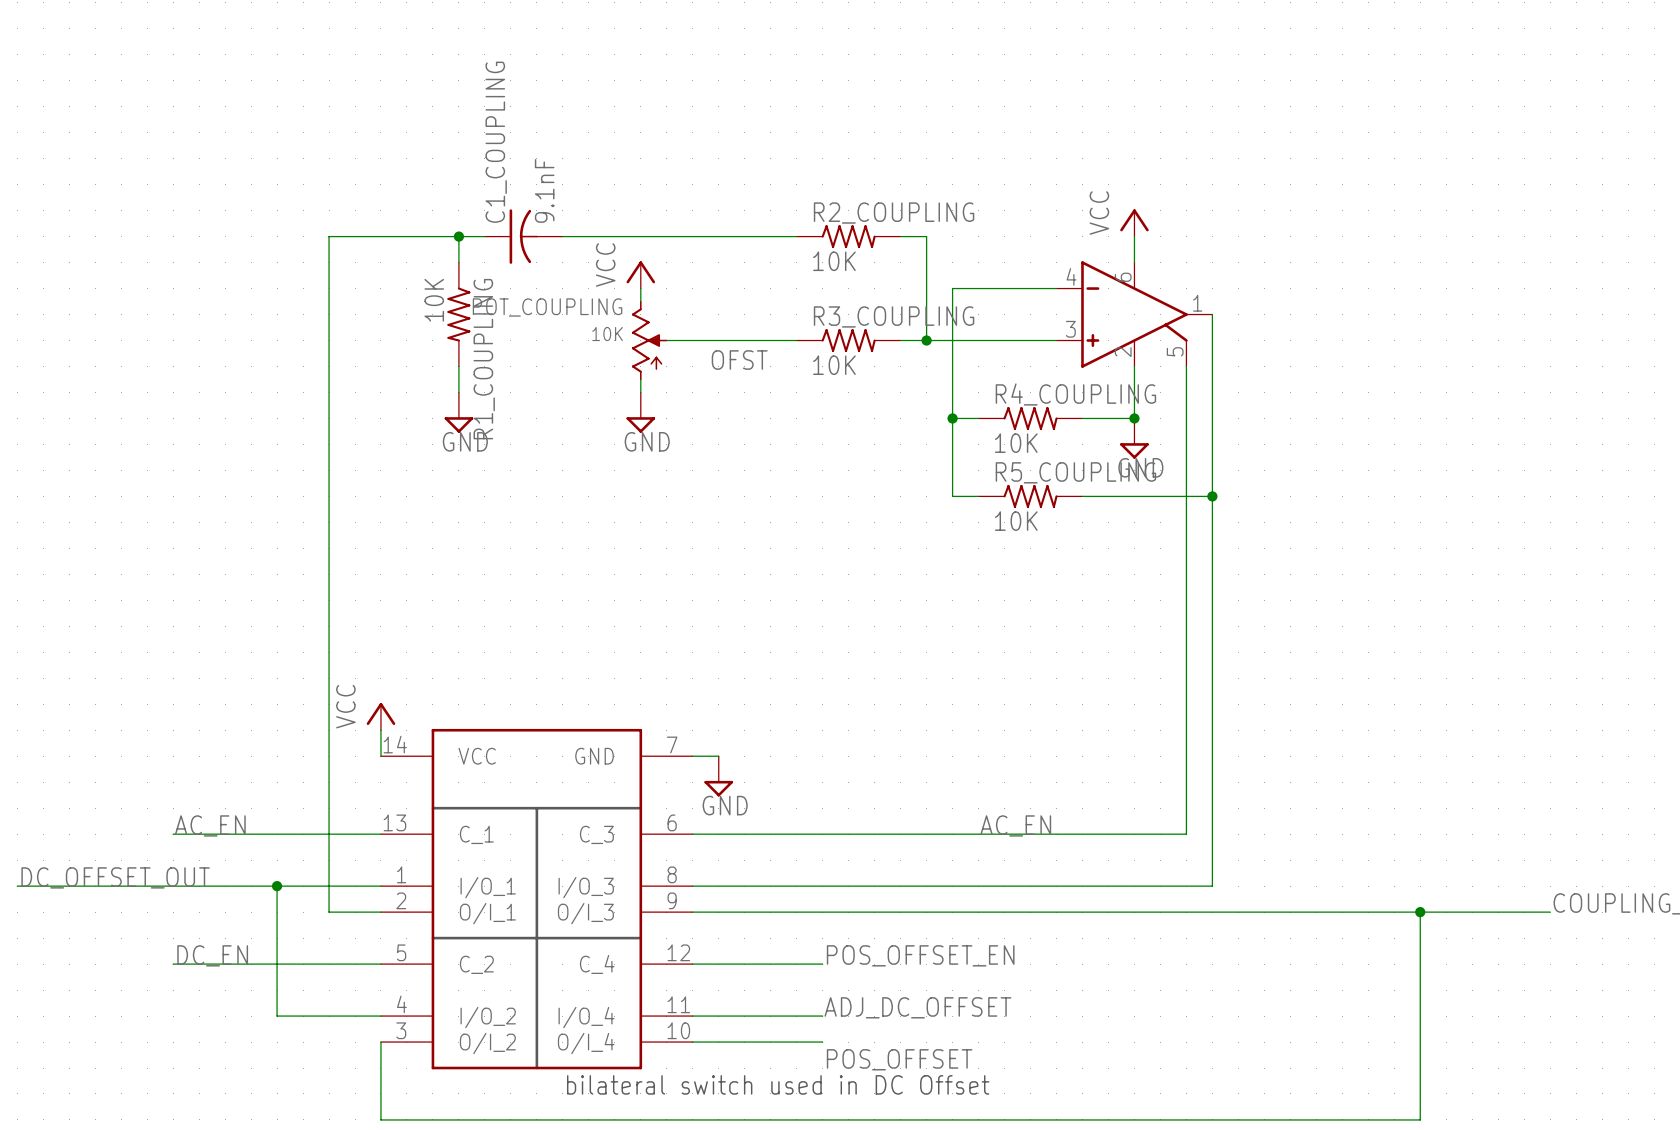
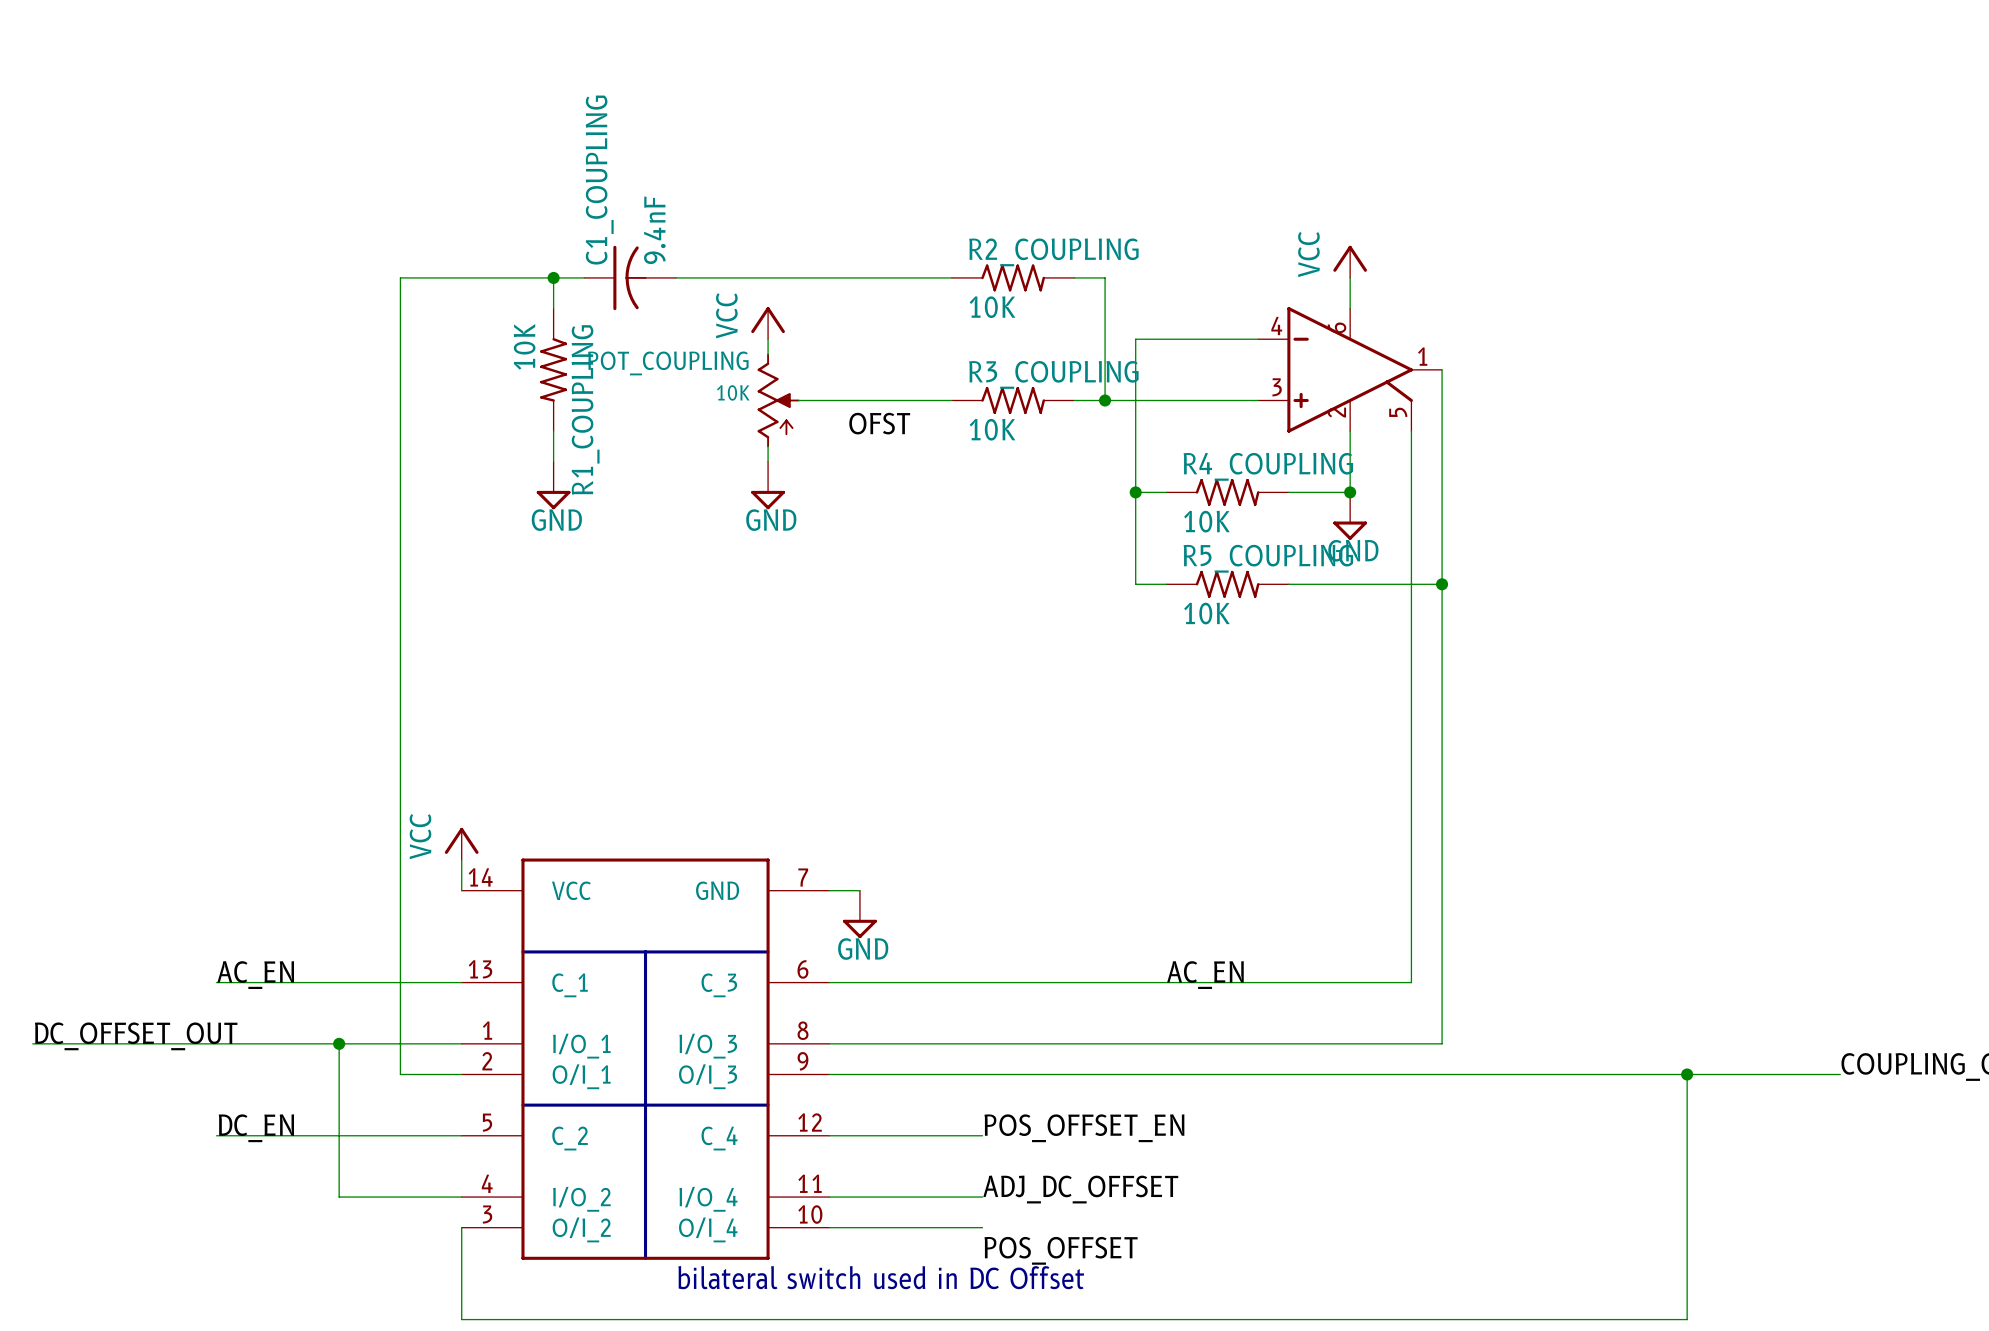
C1_COUPLING value: 9.1nF (544, 190) -> 9.4nF (654, 230)

